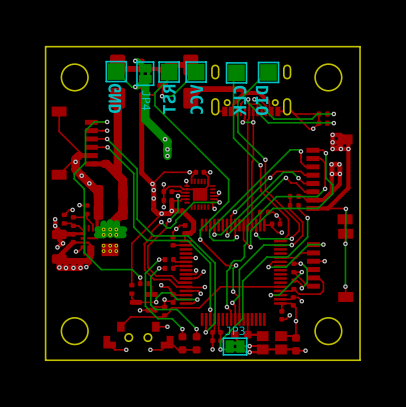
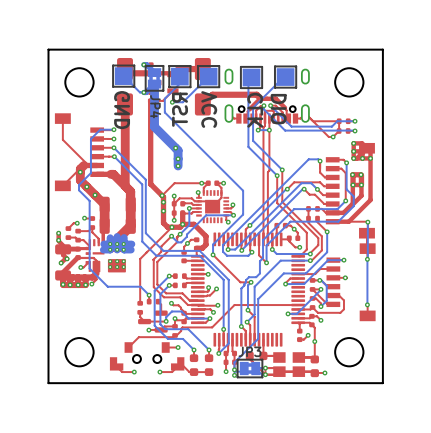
via: none -> (234, 369)
via: (220, 349) -> none
via: none -> (234, 375)

